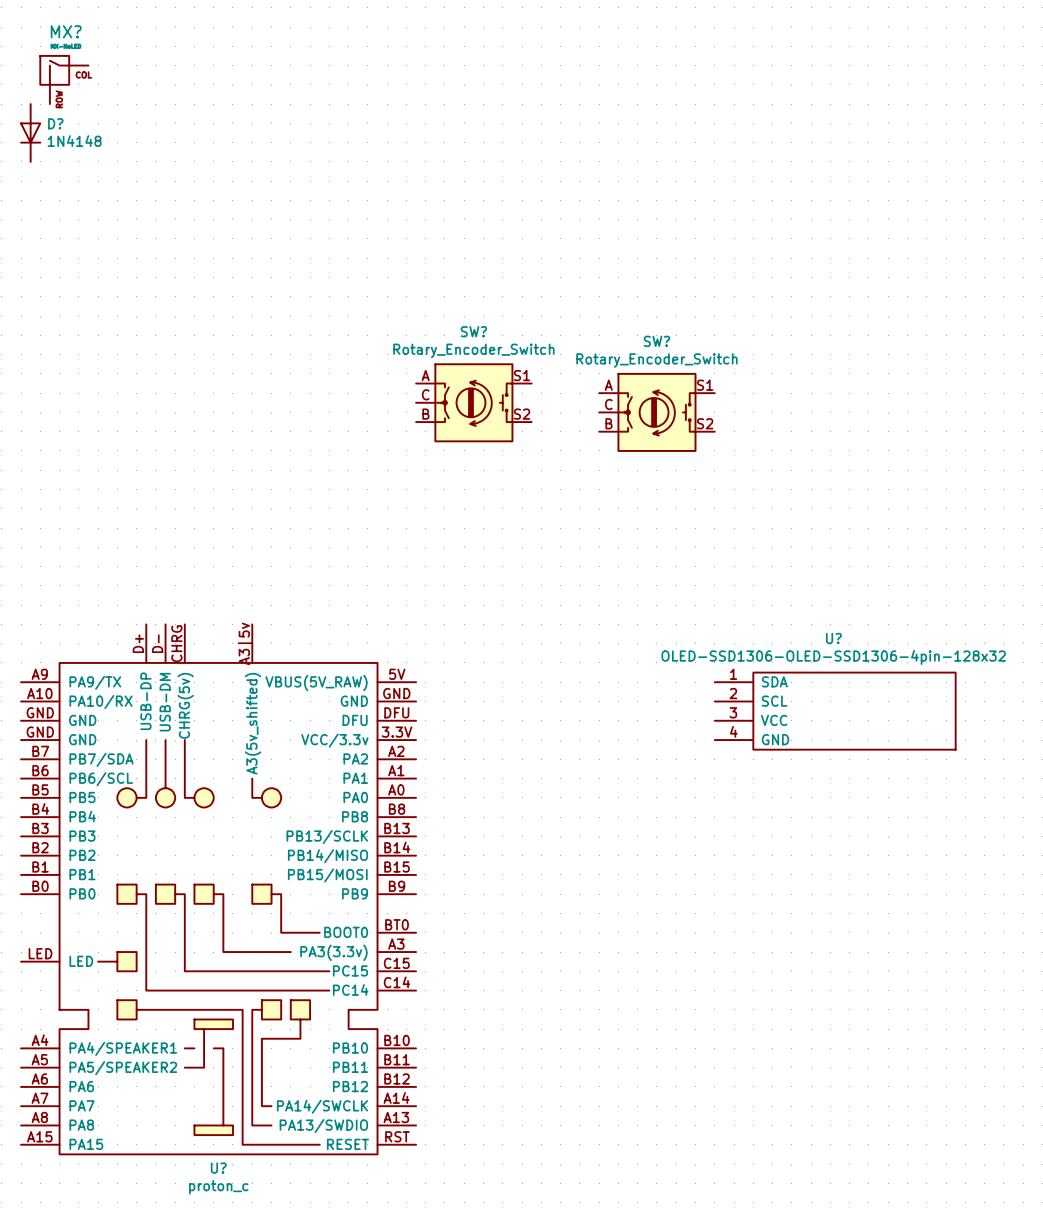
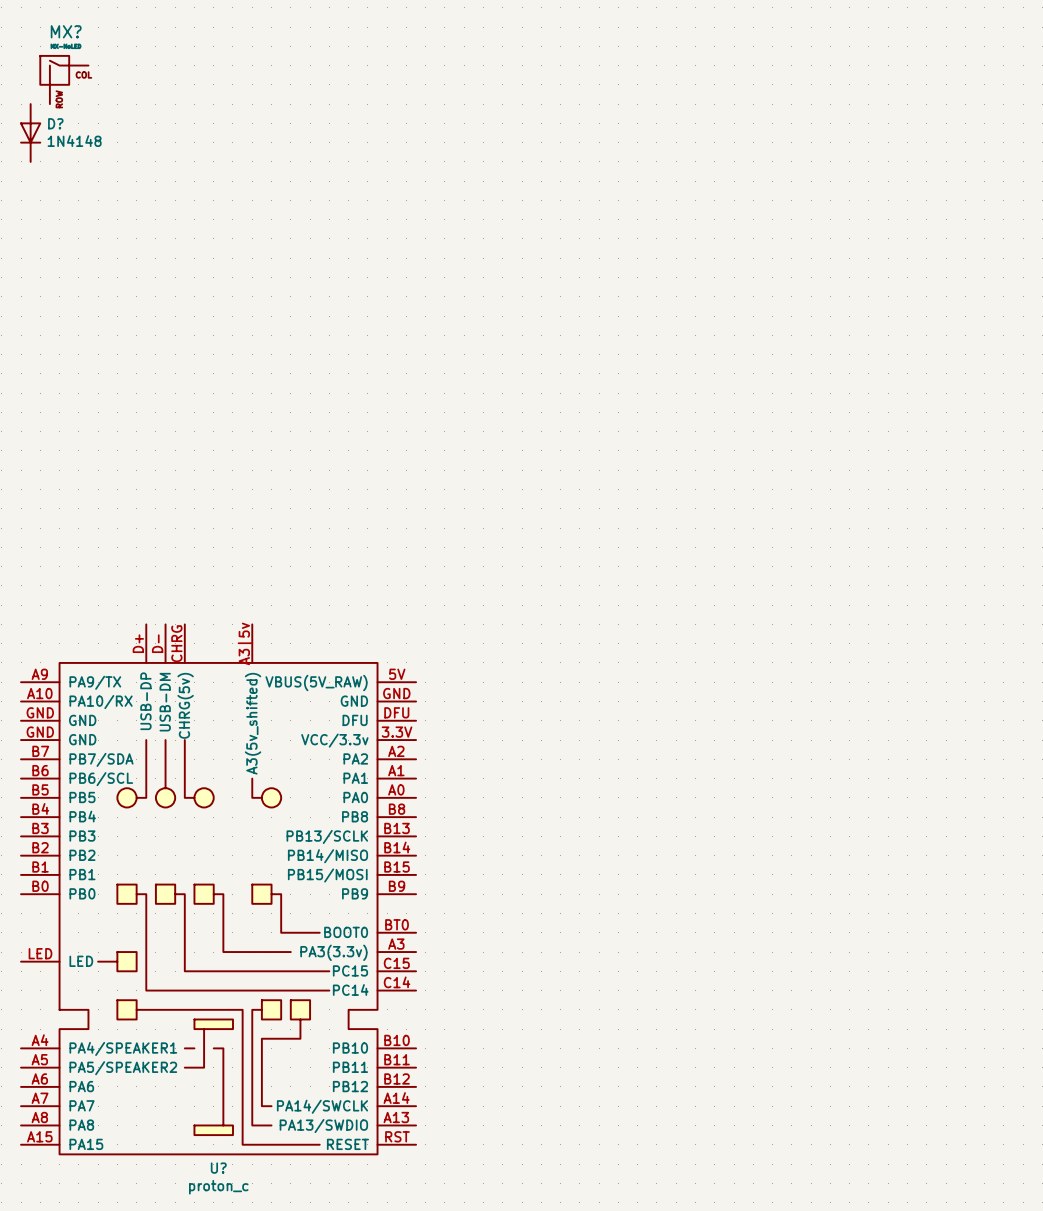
SW?: Rotary_Encoder_Switch (473, 402) -> none
SW?: Rotary_Encoder_Switch (656, 412) -> none
U?: OLED-SSD1306-OLED-SSD1306-4pin-128x32 (835, 711) -> none

